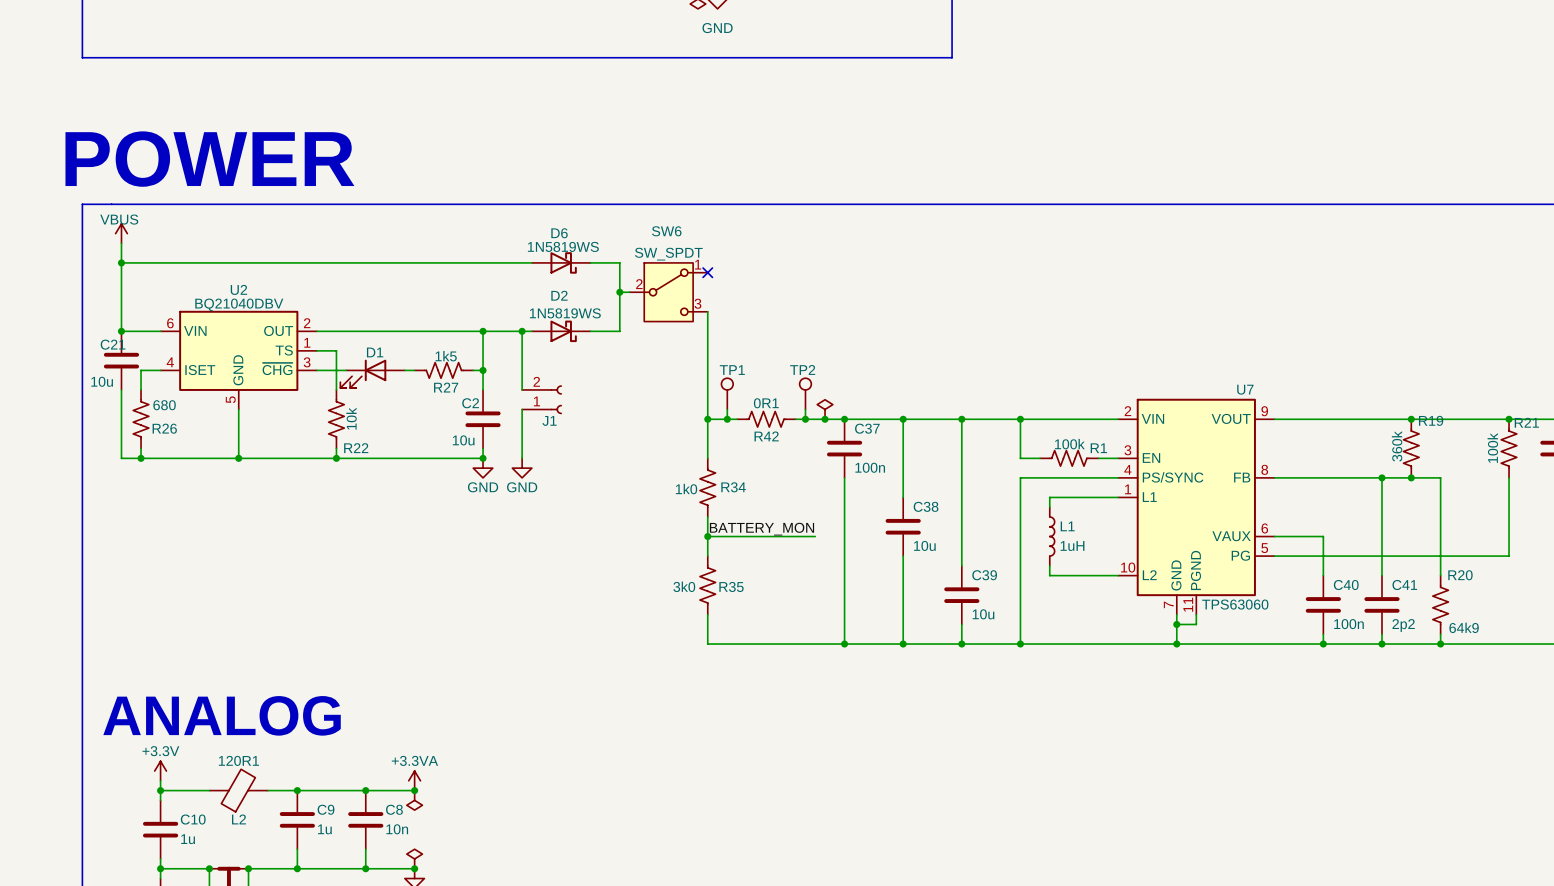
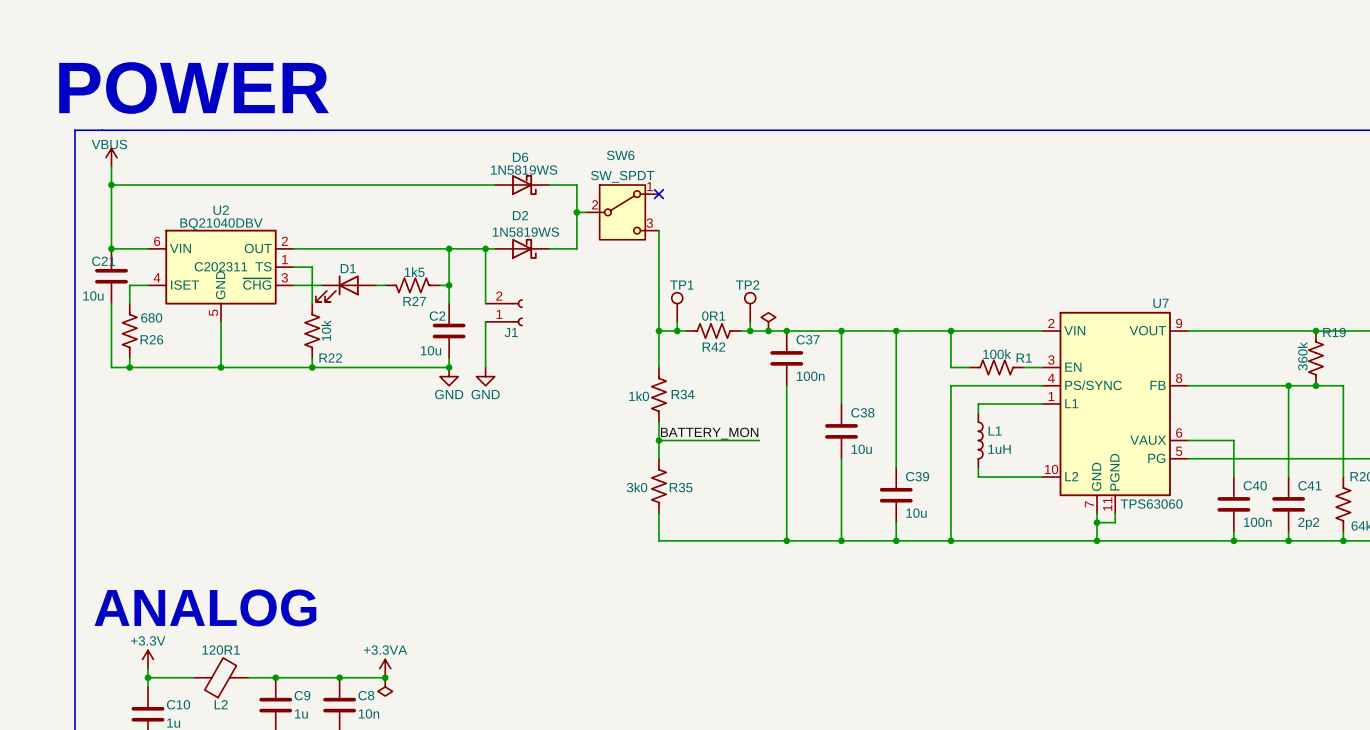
U2 text: none -> C202311 (221, 266)

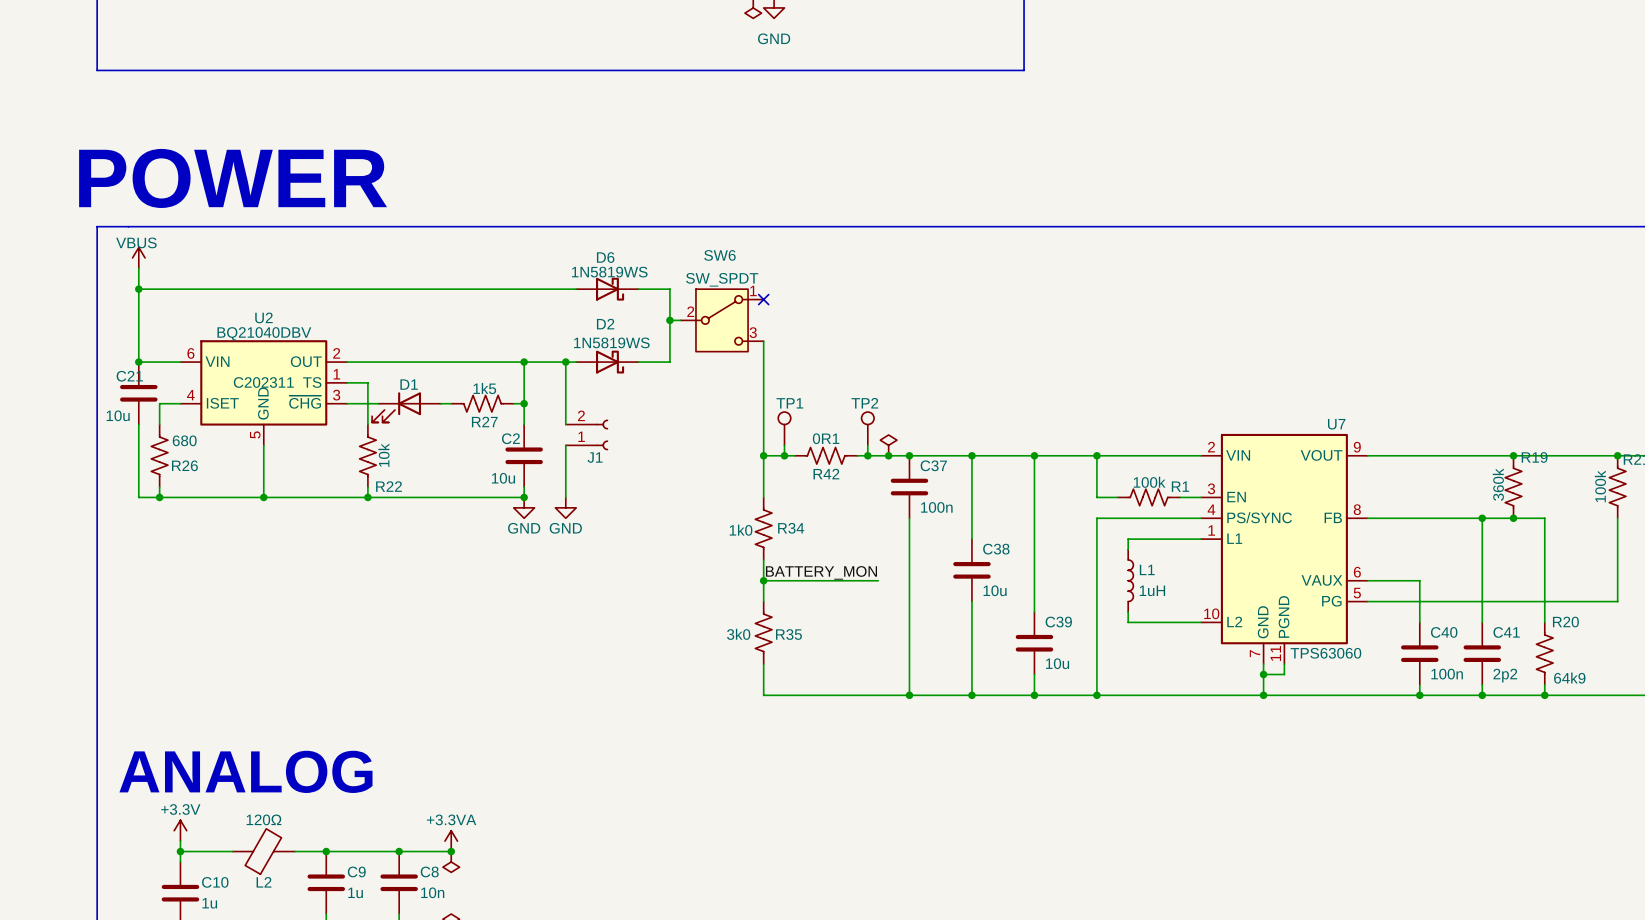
L2 value: 120R1 (221, 650) -> 120Ω (264, 819)

